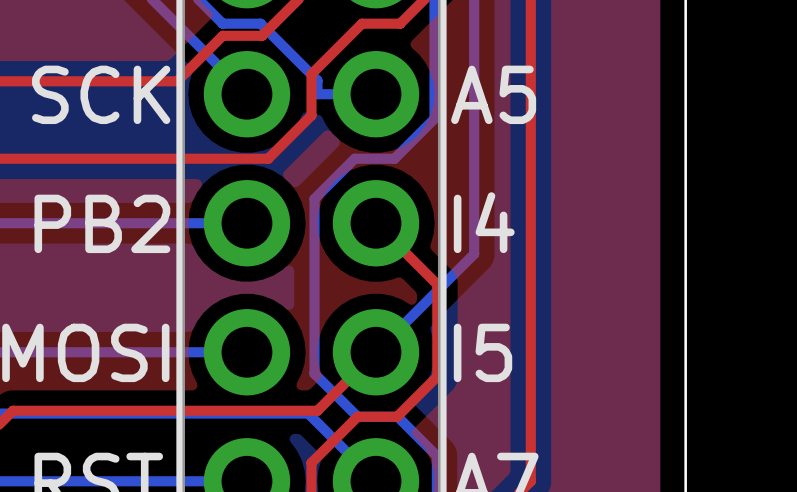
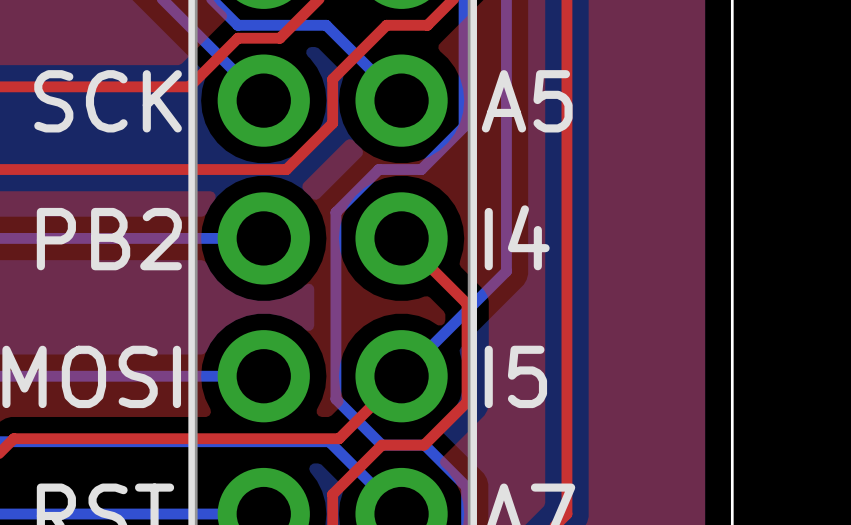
bottom track: (260, 23) (317, 80) (317, 94) (375, 94) -> (278, 25) (326, 25) (401, 100)

